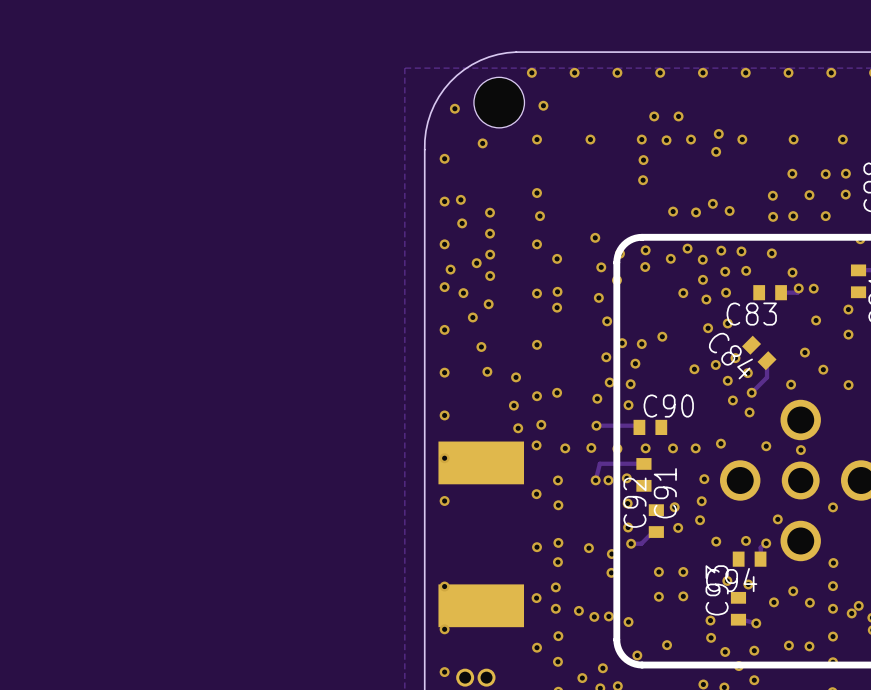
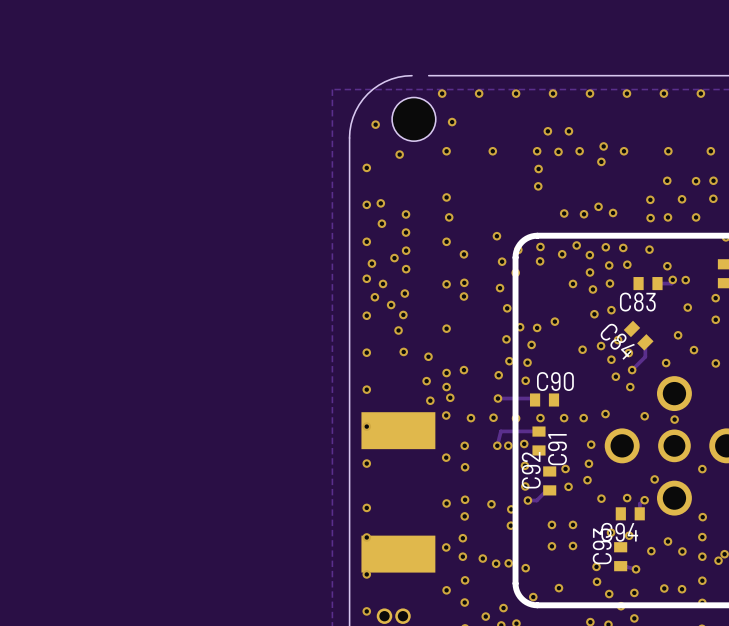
board edge: none -> (412, 75) (398, 77) (384, 81) (367, 93) (355, 110) (351, 124) (349, 138)
board edge: (516, 52) (497, 54) (480, 60) (464, 69) (450, 81) (439, 96) (430, 113) (425, 131) (424, 149) -> (349, 137) (349, 159)
via: none -> (374, 297)
via: none -> (403, 314)
via: none -> (446, 387)
via: none -> (366, 507)

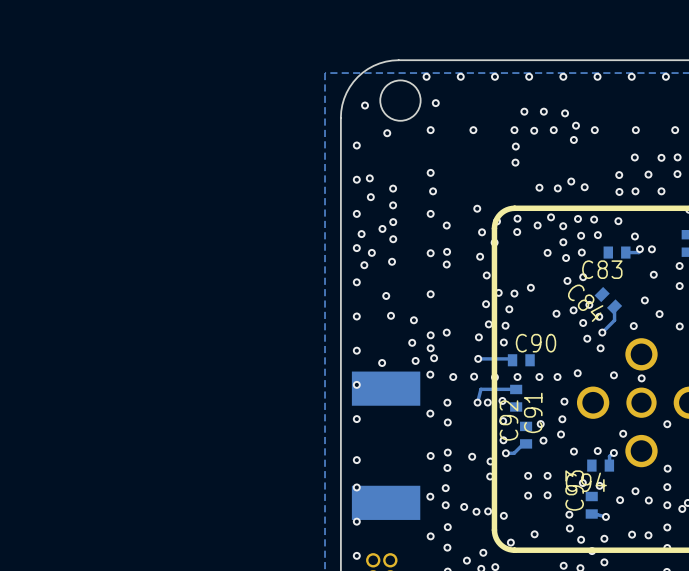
board edge: none -> (414, 60) (398, 60)
via: none -> (565, 113)
via: (391, 305) -> none
via: (403, 314) -> none
via: none -> (382, 363)

